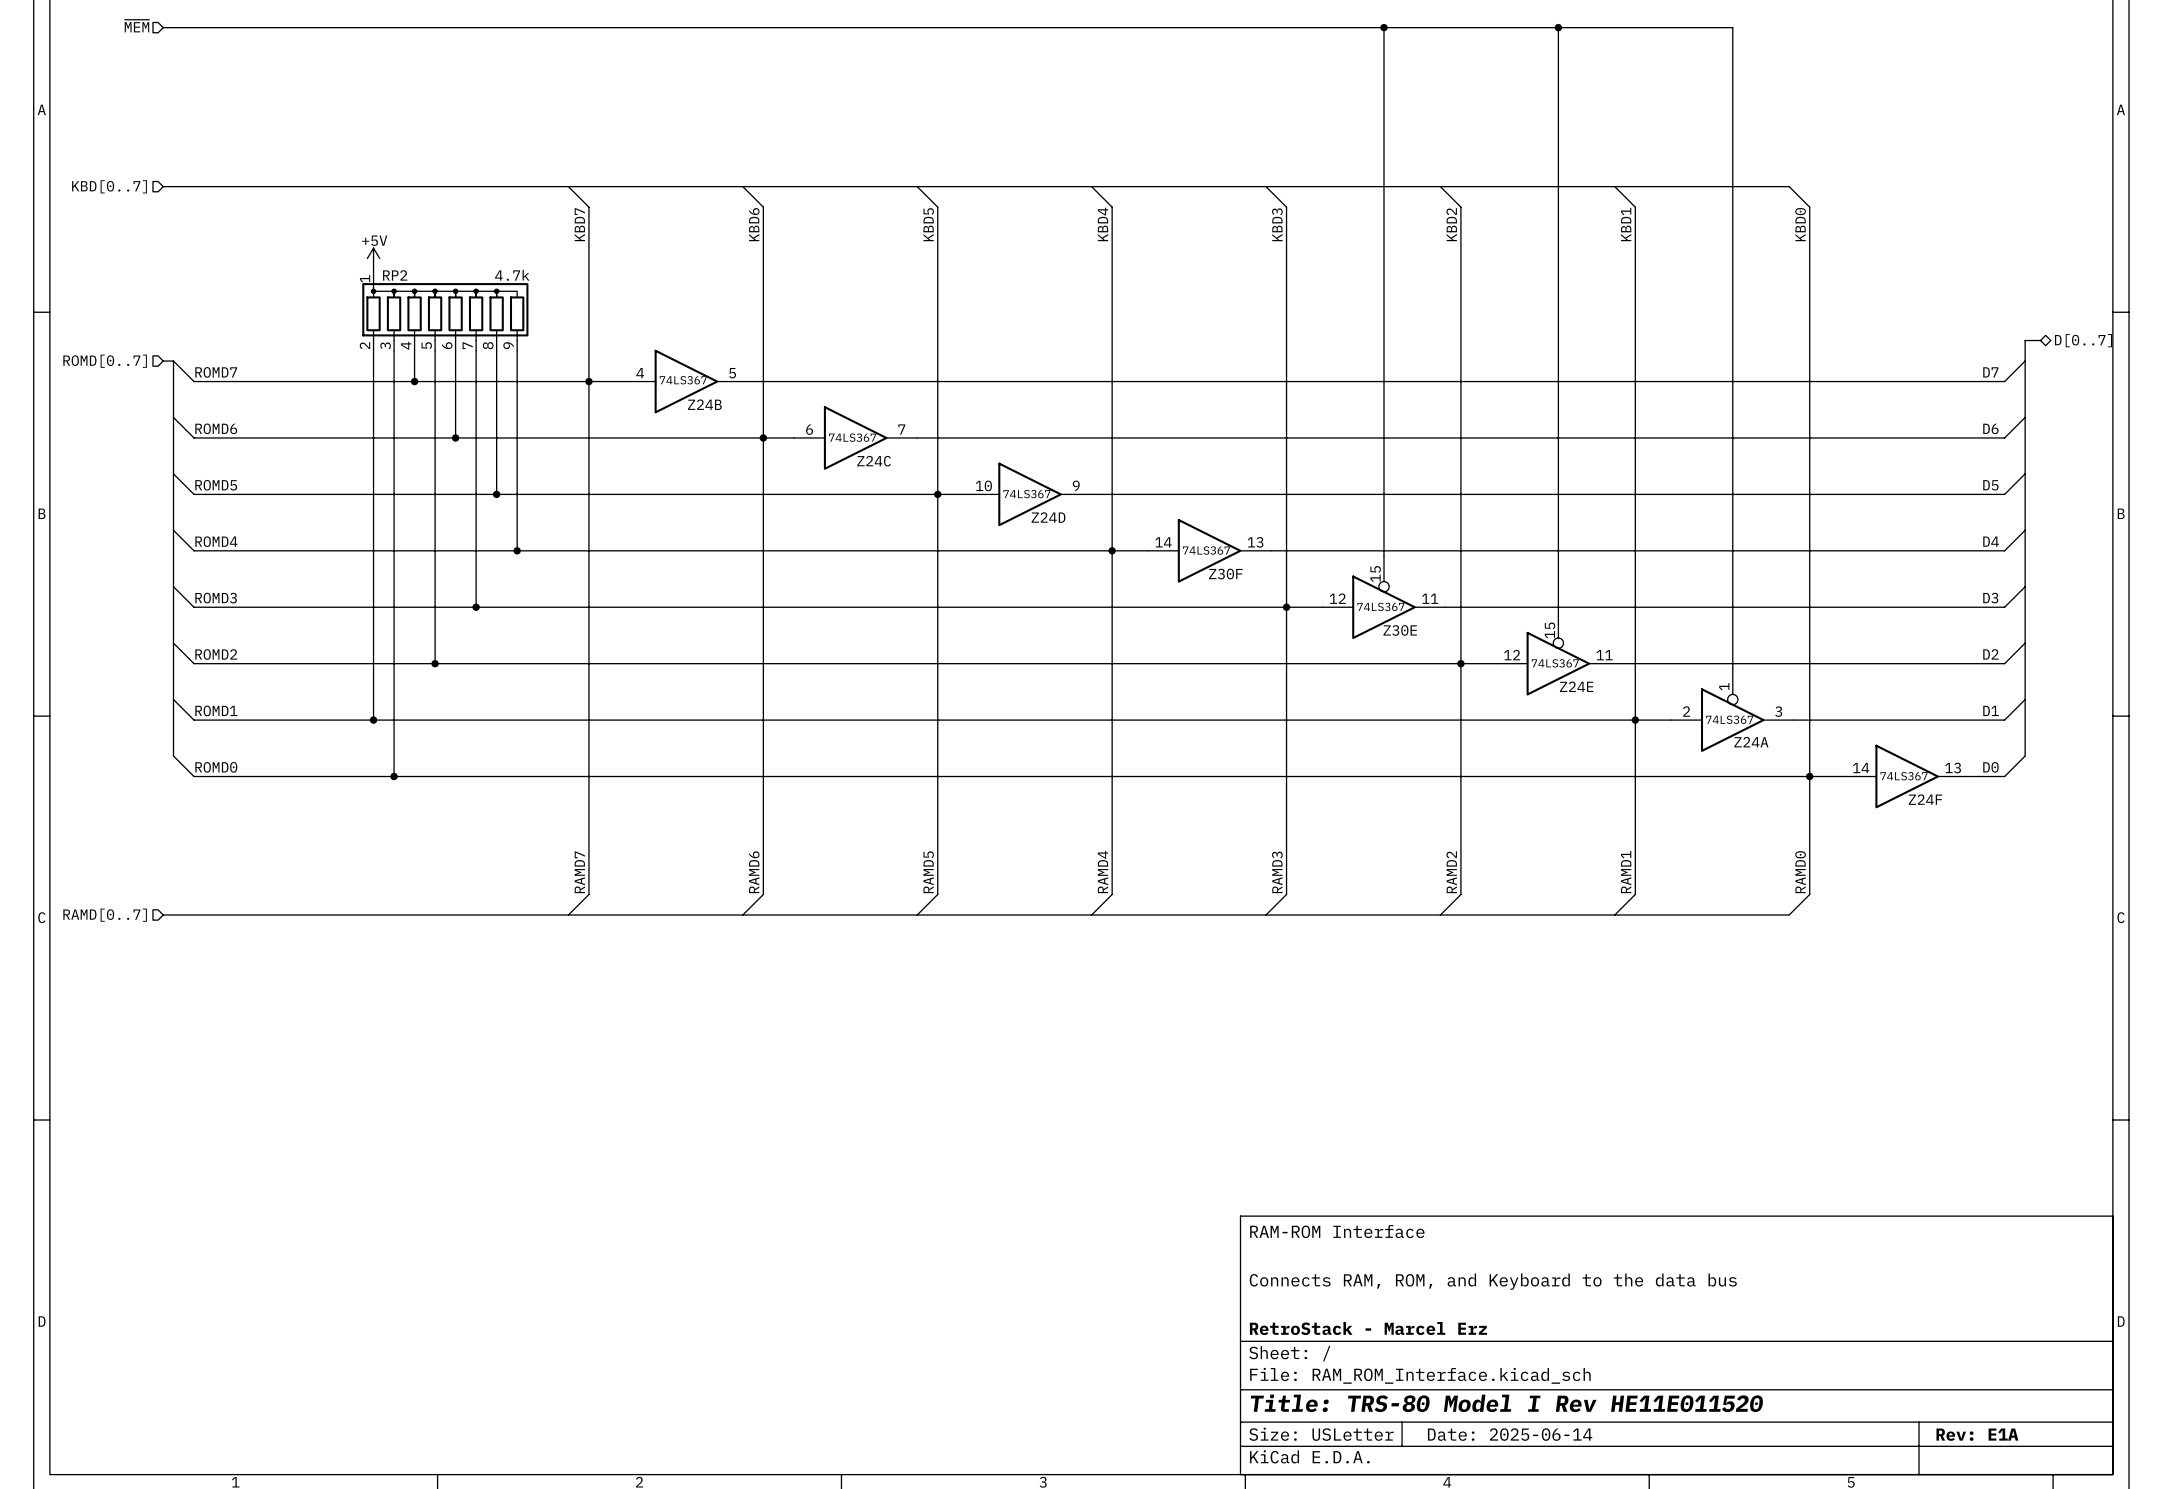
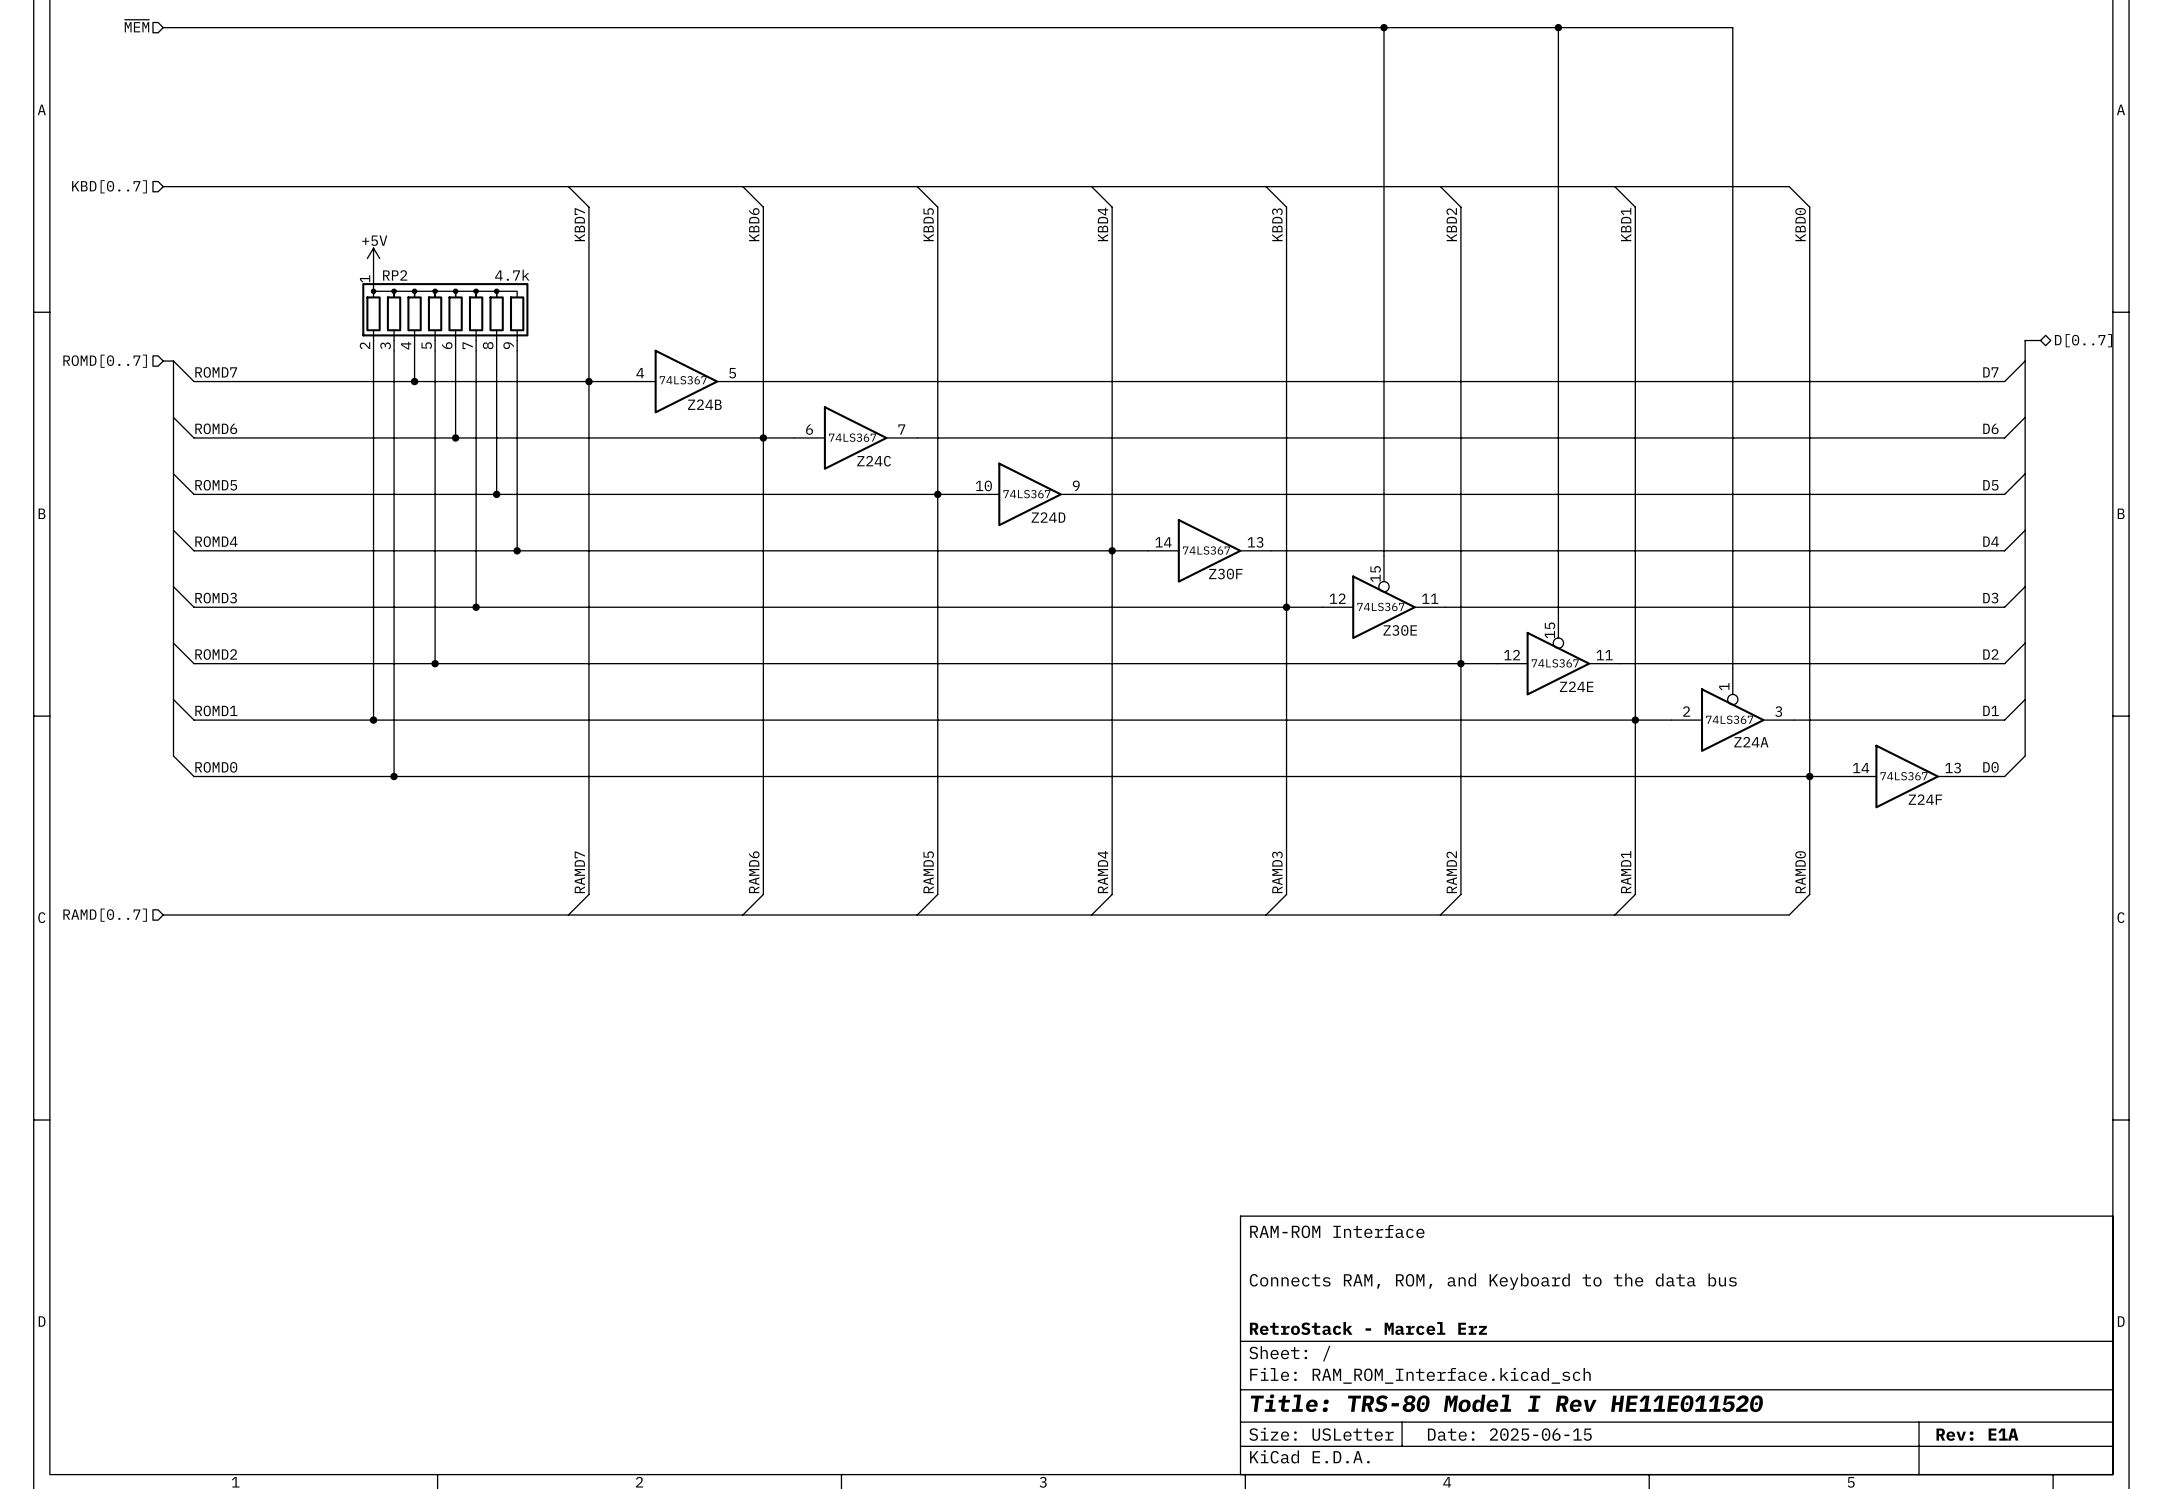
title block: Date: 2025-06-14 (1510, 1434) -> Date: 2025-06-15 (1509, 1434)

